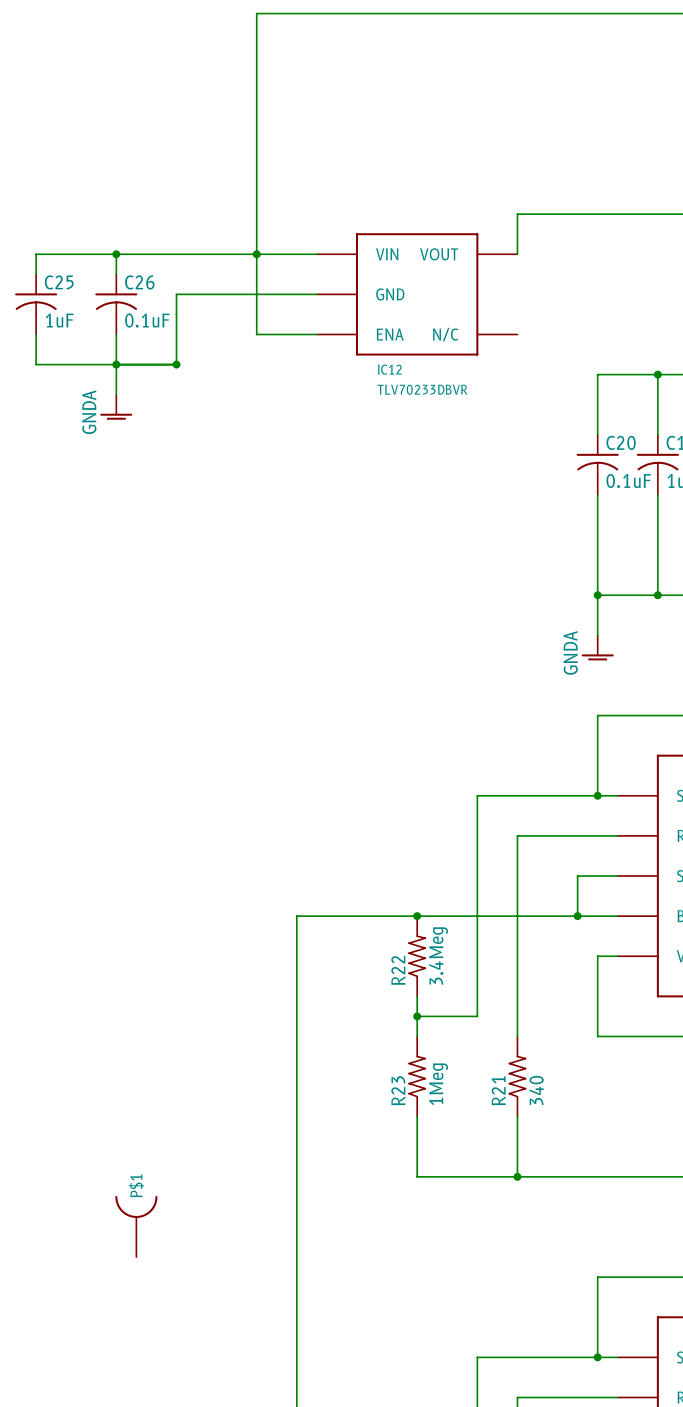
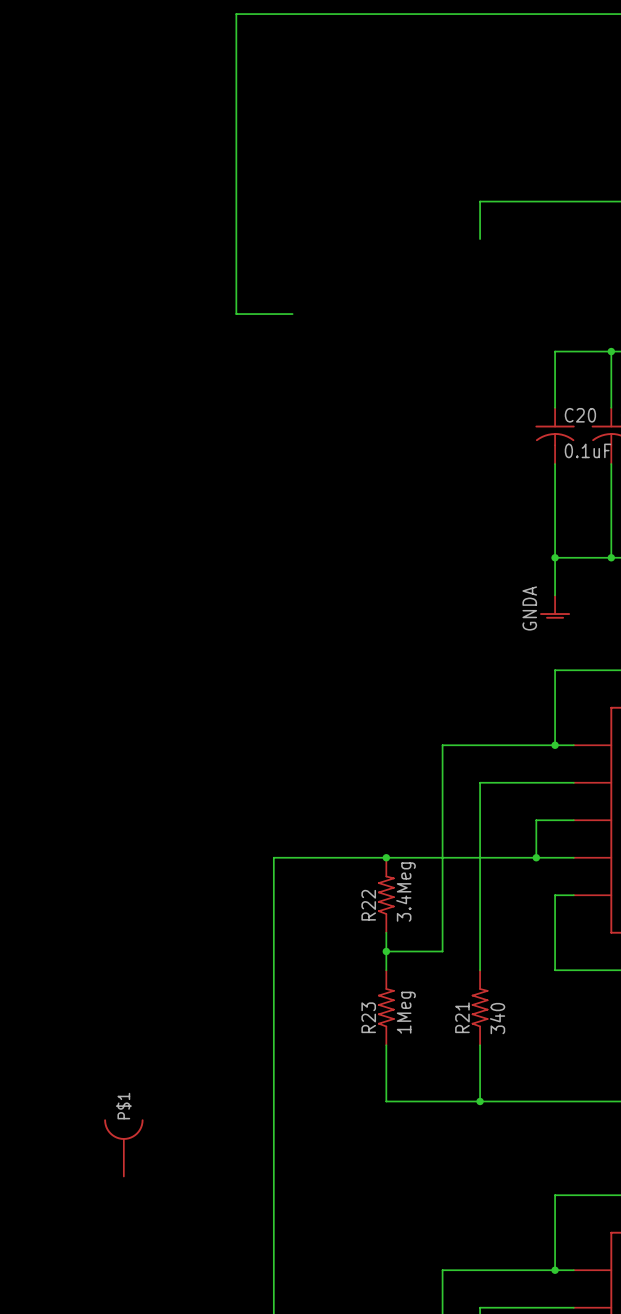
wire: (116, 254) (116, 274) -> none
junction: (116, 254) -> none
junction: (256, 254) -> none
wire: (316, 254) (36, 254) (36, 274) -> none
wire: (316, 294) (176, 294) (176, 364) (36, 364) (36, 334) -> none
IC12: TLV70233DBVR (417, 294) -> none
C25: 1uF (36, 304) -> none
C26: 0.1uF (116, 304) -> none
wire: (116, 334) (116, 394) -> none
junction: (116, 364) -> none
junction: (176, 364) -> none
power symbol: GNDA (116, 407) -> none

